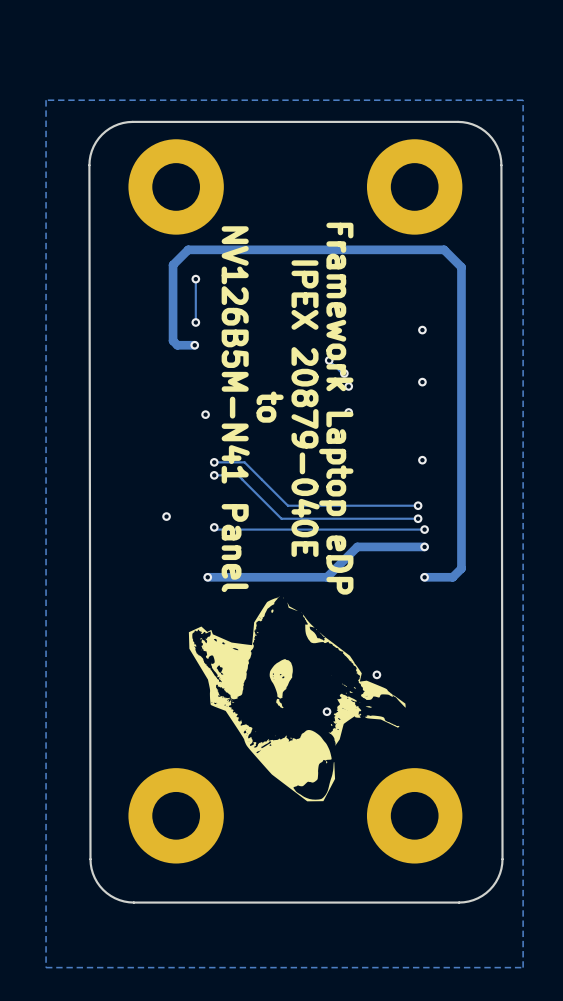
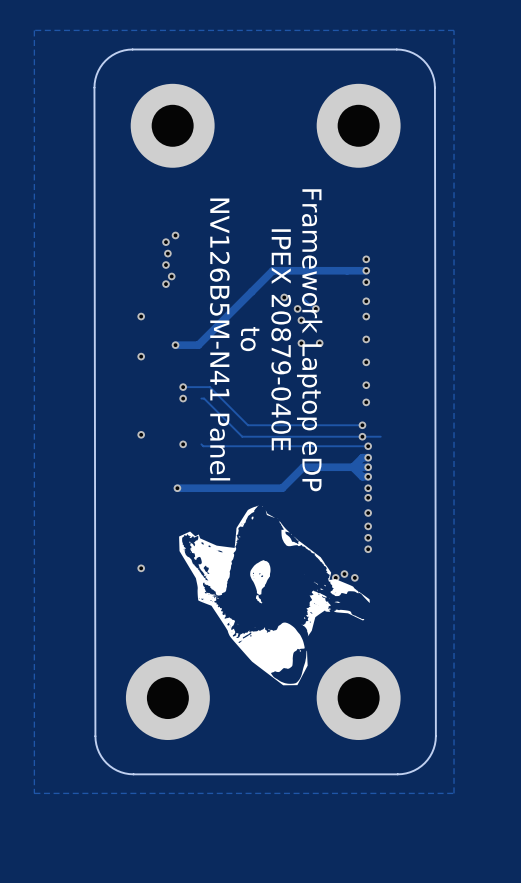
zone outline: (523, 100) (523, 967) (46, 967) (46, 100) (523, 100) -> (454, 30) (454, 793) (34, 793) (34, 30) (454, 30)
part position: (176, 186) -> (172, 125)
part position: (414, 186) -> (358, 125)
track: (195, 279) (195, 322) -> none
via: (195, 279) -> none
via: none -> (175, 235)
via: none -> (165, 242)
via: none -> (167, 253)
via: none -> (366, 259)
via: (195, 322) -> none
via: none -> (165, 265)
track: none -> (364, 270) (272, 270) (198, 345) (175, 345)
via: none -> (366, 270)
via: (422, 330) -> none
via: none -> (171, 276)
via: none -> (366, 282)
via: none -> (165, 284)
track: (194, 345) (177, 345) (173, 340) (173, 265) (188, 249) (444, 249) (461, 267) (461, 568) (452, 577) (424, 577) -> none
via: (194, 345) -> none
via: none -> (284, 297)
via: (329, 360) -> none
via: none -> (366, 301)
via: none -> (297, 308)
via: none -> (141, 316)
via: none -> (366, 316)
via: (422, 382) -> none
via: none -> (301, 320)
via: (348, 386) -> none
via: none -> (366, 339)
via: none -> (301, 343)
via position: (205, 414) -> (175, 345)
via: none -> (141, 356)
via: none -> (366, 362)
via: none -> (366, 385)
via: (422, 460) -> none
via: none -> (183, 387)
via: (214, 462) -> none
track: (223, 462) (244, 462) (287, 505) -> (209, 387) (248, 425) (266, 425)
via: none -> (183, 398)
via: (214, 475) -> none
track: (217, 475) (238, 475) (281, 518) -> (204, 398) (242, 436) (260, 436)
via: none -> (366, 402)
via: none -> (362, 425)
track: (418, 505) (397, 505) -> (201, 387) (183, 387)
via: (418, 505) -> none
via: none -> (141, 434)
via: (166, 516) -> none
via: none -> (362, 436)
via: (418, 518) -> none
via: none -> (183, 444)
via: (214, 527) -> none
via: none -> (368, 446)
track: (424, 529) (403, 529) -> (195, 488) (177, 488)
via: (424, 529) -> none
track: none -> (368, 457) (362, 457) (352, 467) (362, 476) (368, 476)
via: none -> (368, 457)
track: (424, 546) (357, 546) (327, 577) (306, 577) -> (368, 467) (303, 467) (282, 488)
via: (424, 546) -> none
via: none -> (368, 467)
via: none -> (368, 476)
via position: (207, 577) -> (177, 488)
via: none -> (368, 488)
via: (424, 577) -> none
via: none -> (368, 497)
via: none -> (368, 513)
via: none -> (368, 526)
via: none -> (368, 537)
via: none -> (368, 549)
via: none -> (141, 568)
via: none -> (335, 577)
via: none -> (354, 577)
via: (327, 711) -> none
part position: (414, 815) -> (358, 698)
board edge: (437, 902) (463, 902) (482, 895) (493, 886) (498, 878) (502, 859) (501, 160) (497, 146) (485, 131) (472, 124) (458, 121) (127, 122) (113, 126) (105, 131) (98, 138) (91, 150) (89, 165) (90, 864) (97, 882) (106, 893) (119, 900) (137, 902) -> (397, 774) (414, 770) (424, 763) (433, 748) (435, 736) (434, 87) (432, 75) (420, 57) (401, 49) (132, 49) (120, 51) (105, 60) (98, 71) (94, 87) (95, 740) (101, 756) (109, 766) (120, 772) (133, 774)

